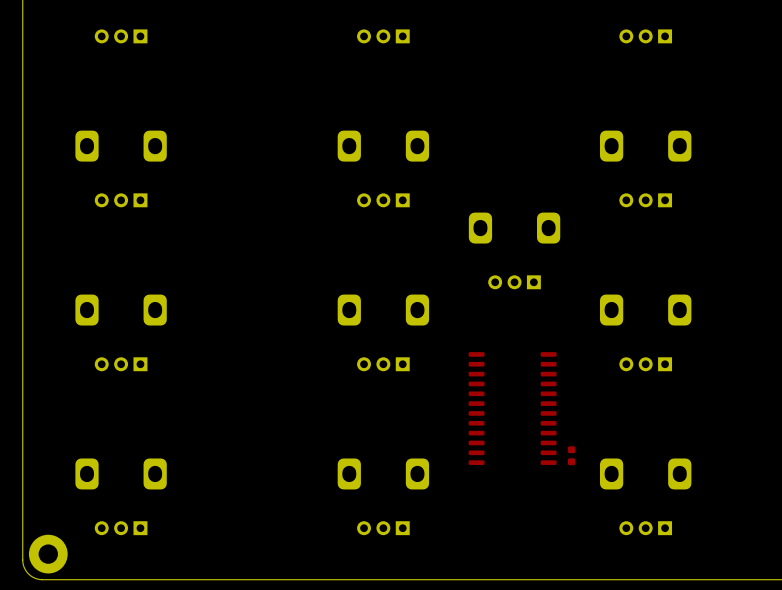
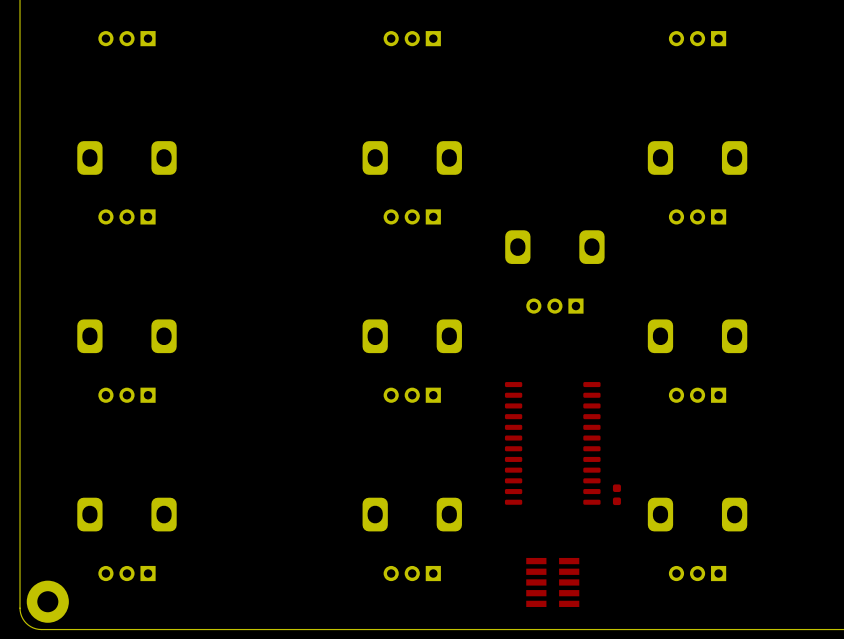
part: none -> (552, 582)

